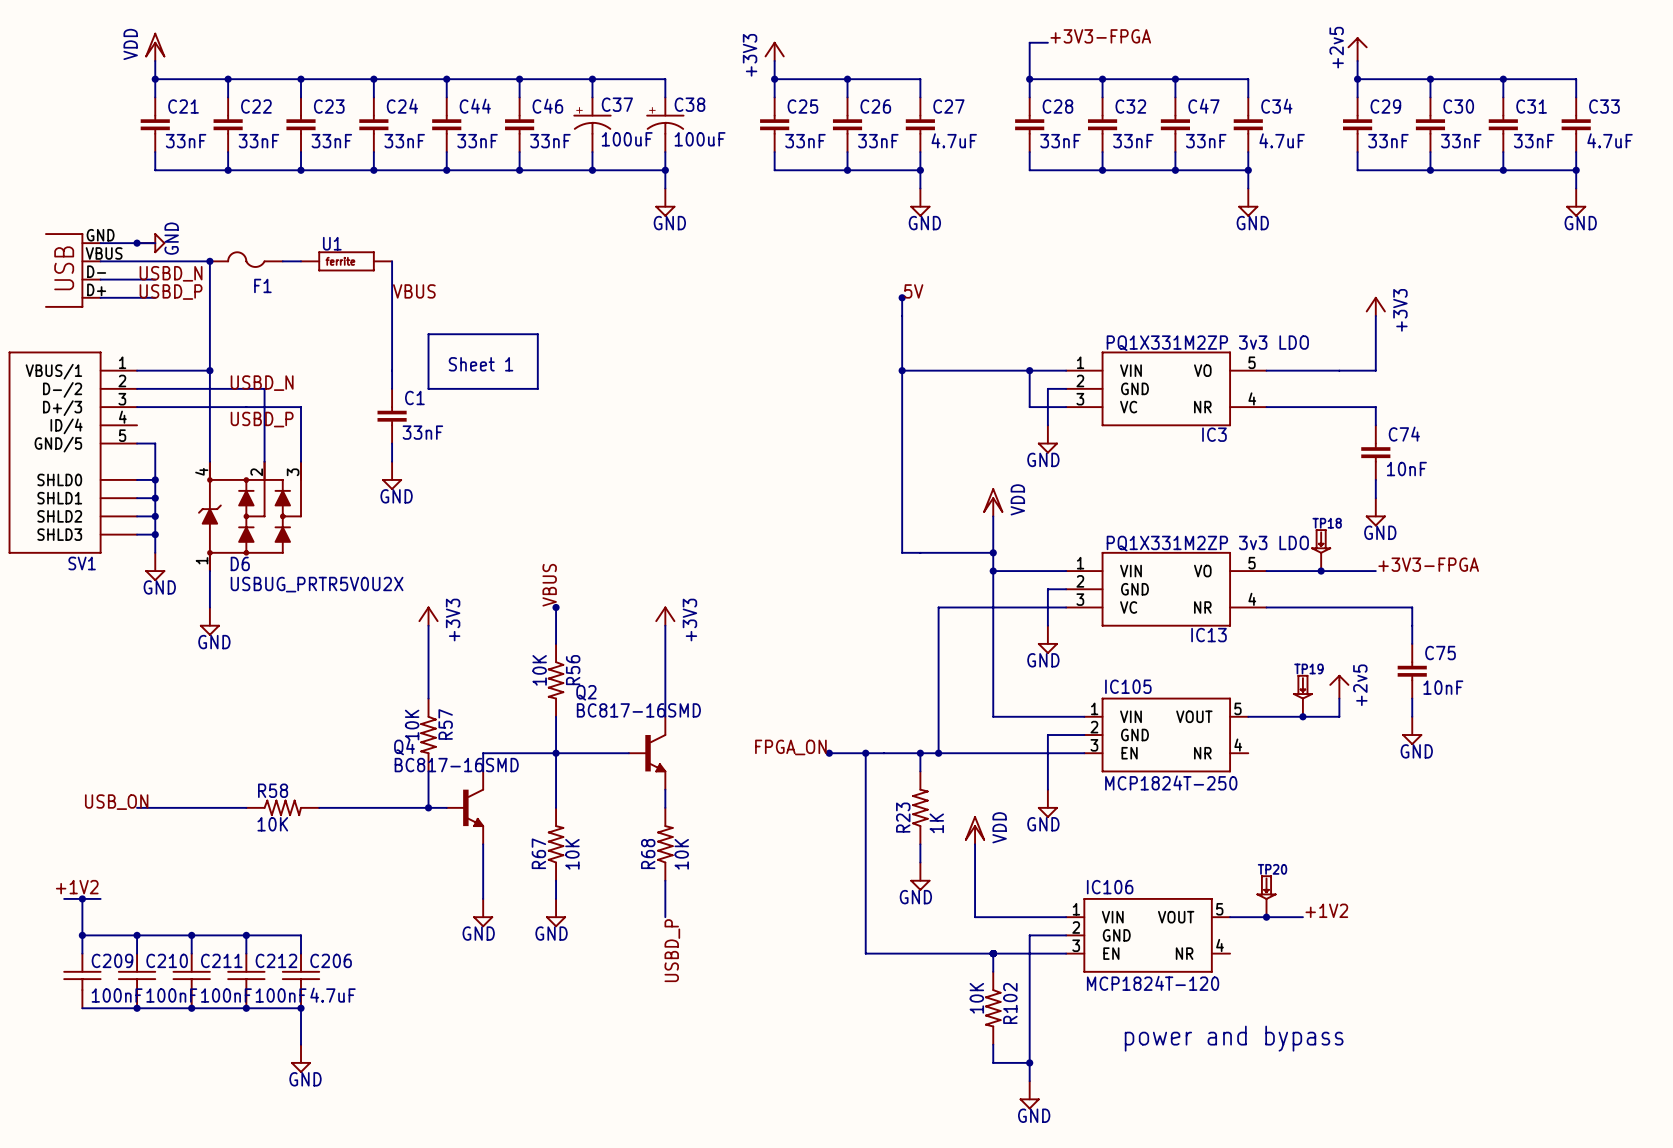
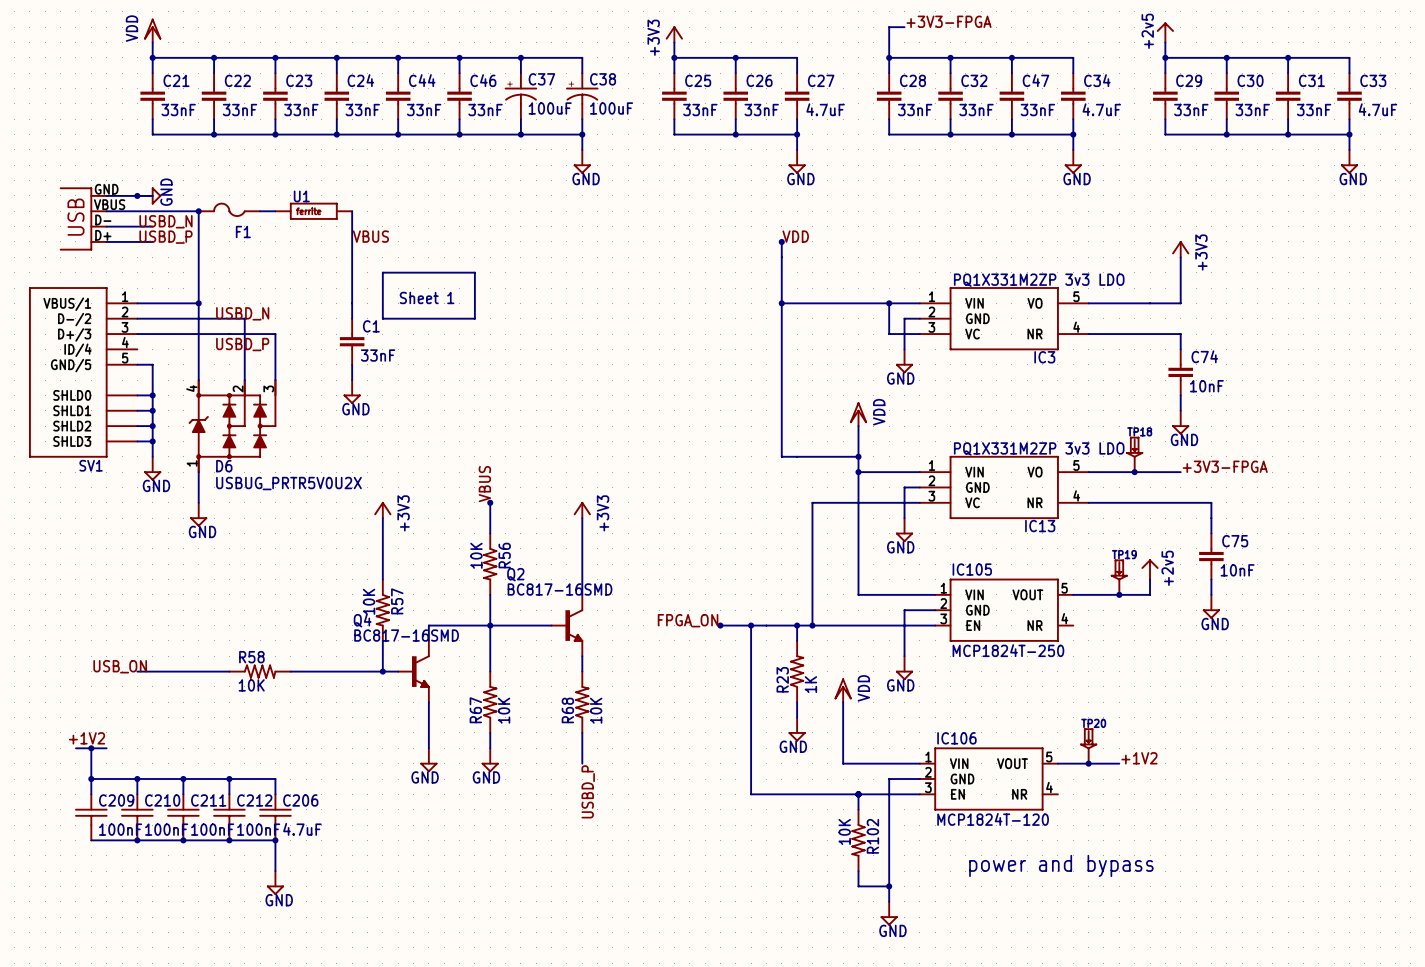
label: 5V (913, 291) -> VDD (795, 236)

